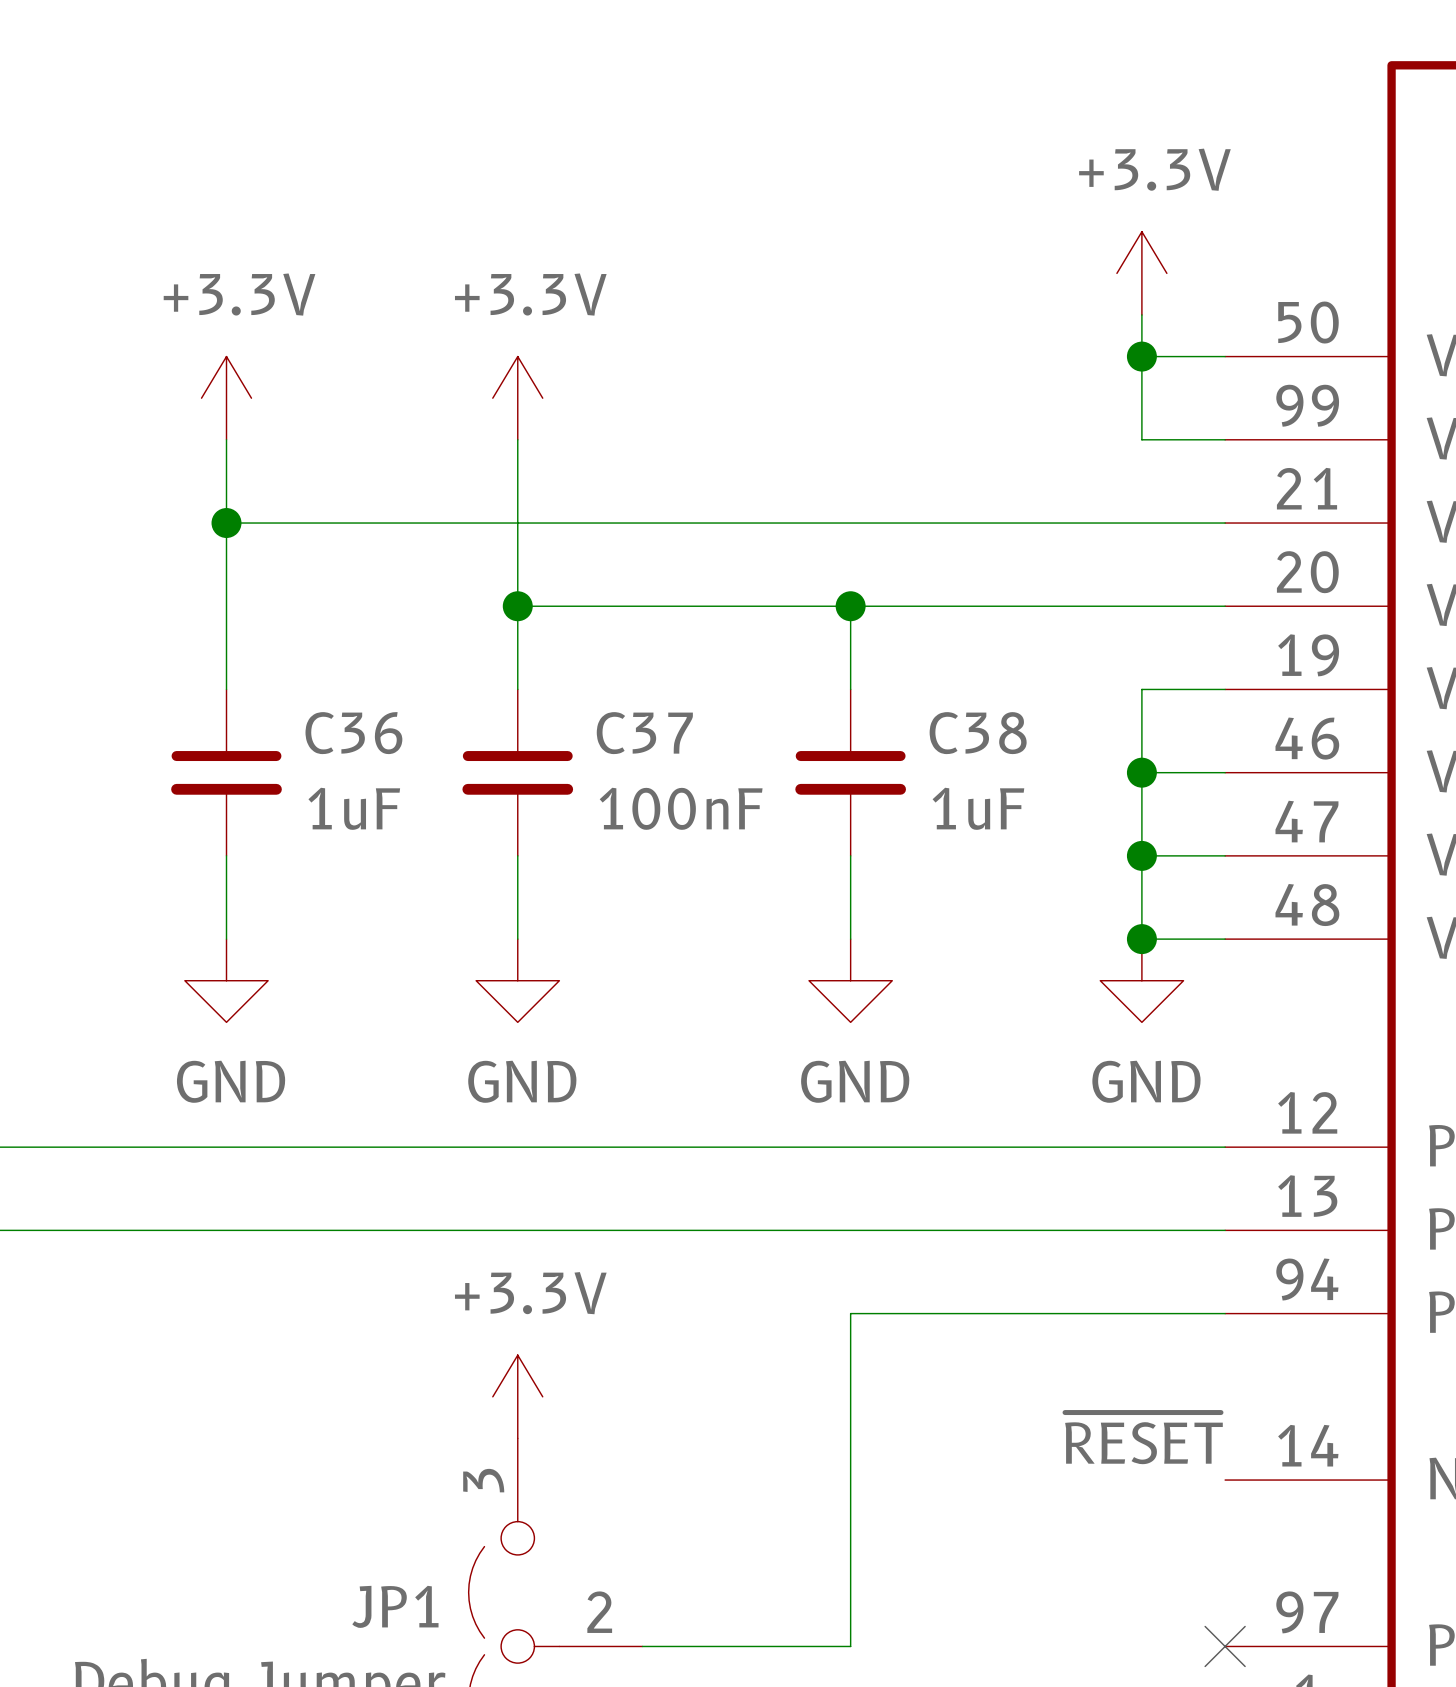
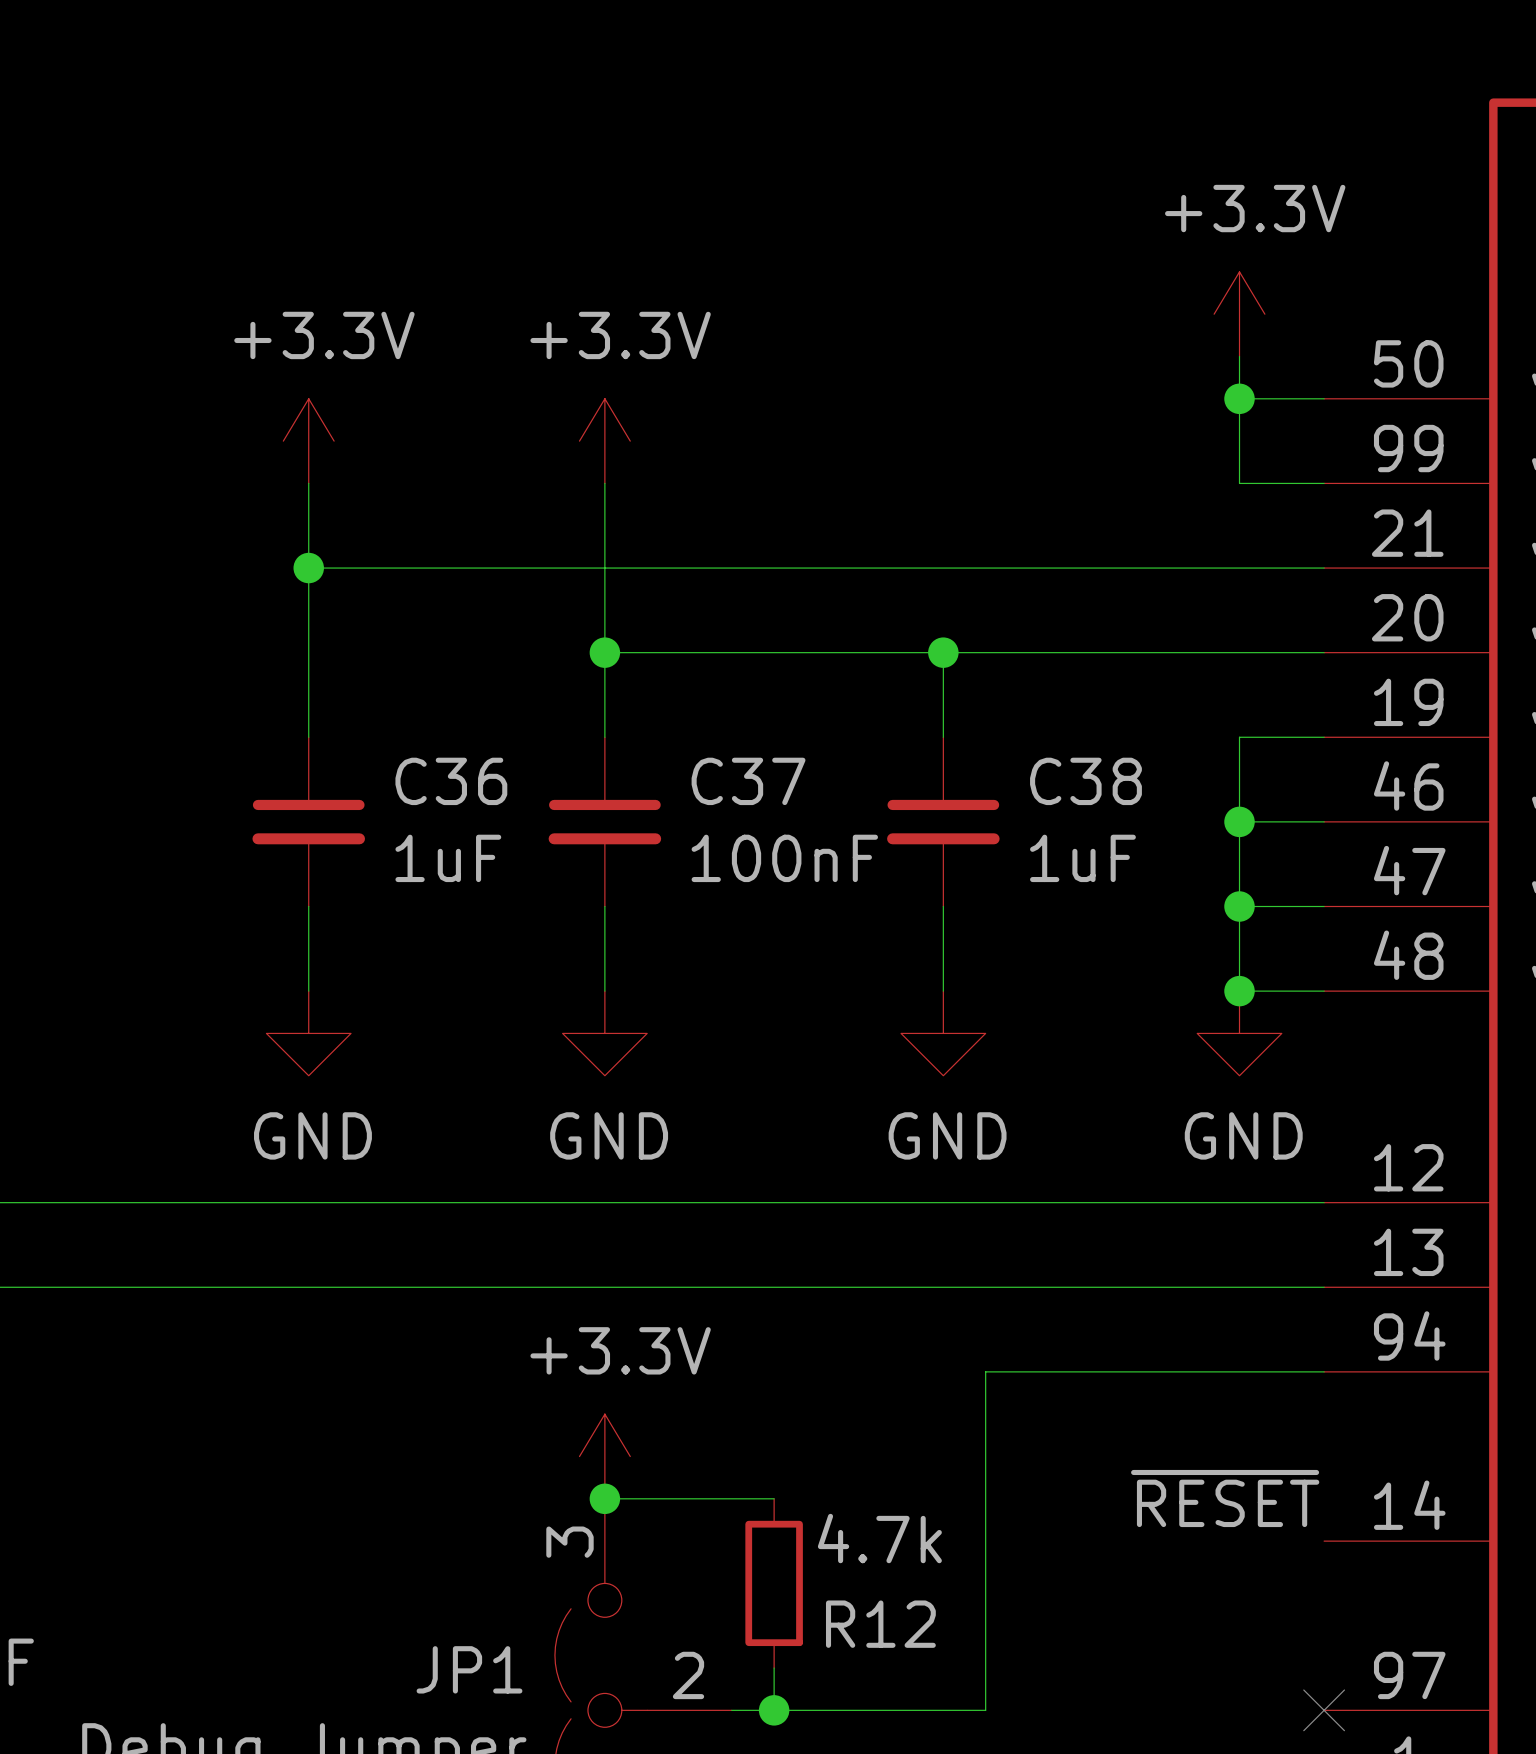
wire: (892, 1313) (850, 1313) (850, 1646) -> (985, 1371) (985, 1710) (943, 1710)
wire: none -> (604, 1498) (774, 1498)
junction: none -> (604, 1498)
R12: none -> 4.7k (774, 1583)
wire: none -> (774, 1668) (774, 1710)
junction: none -> (774, 1710)

